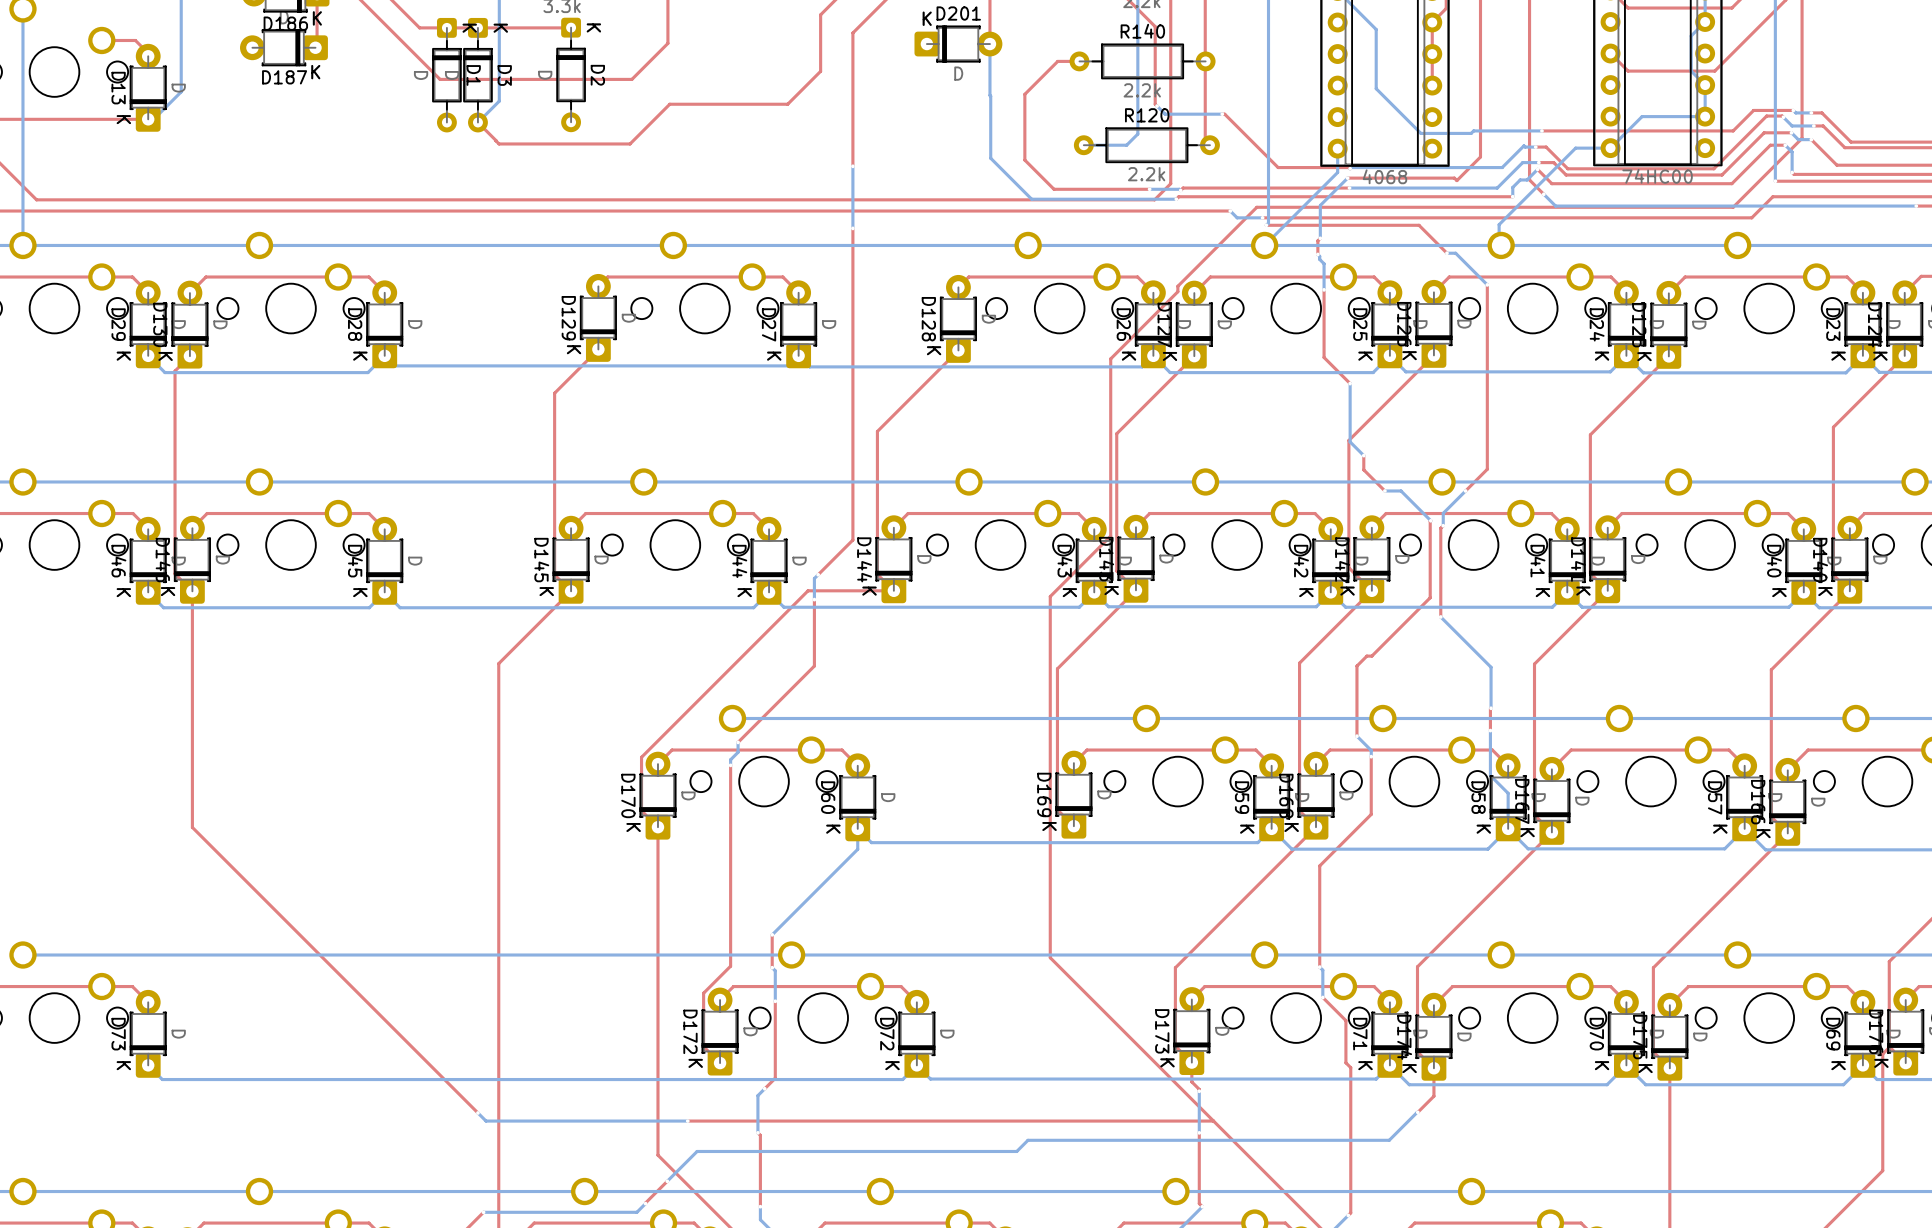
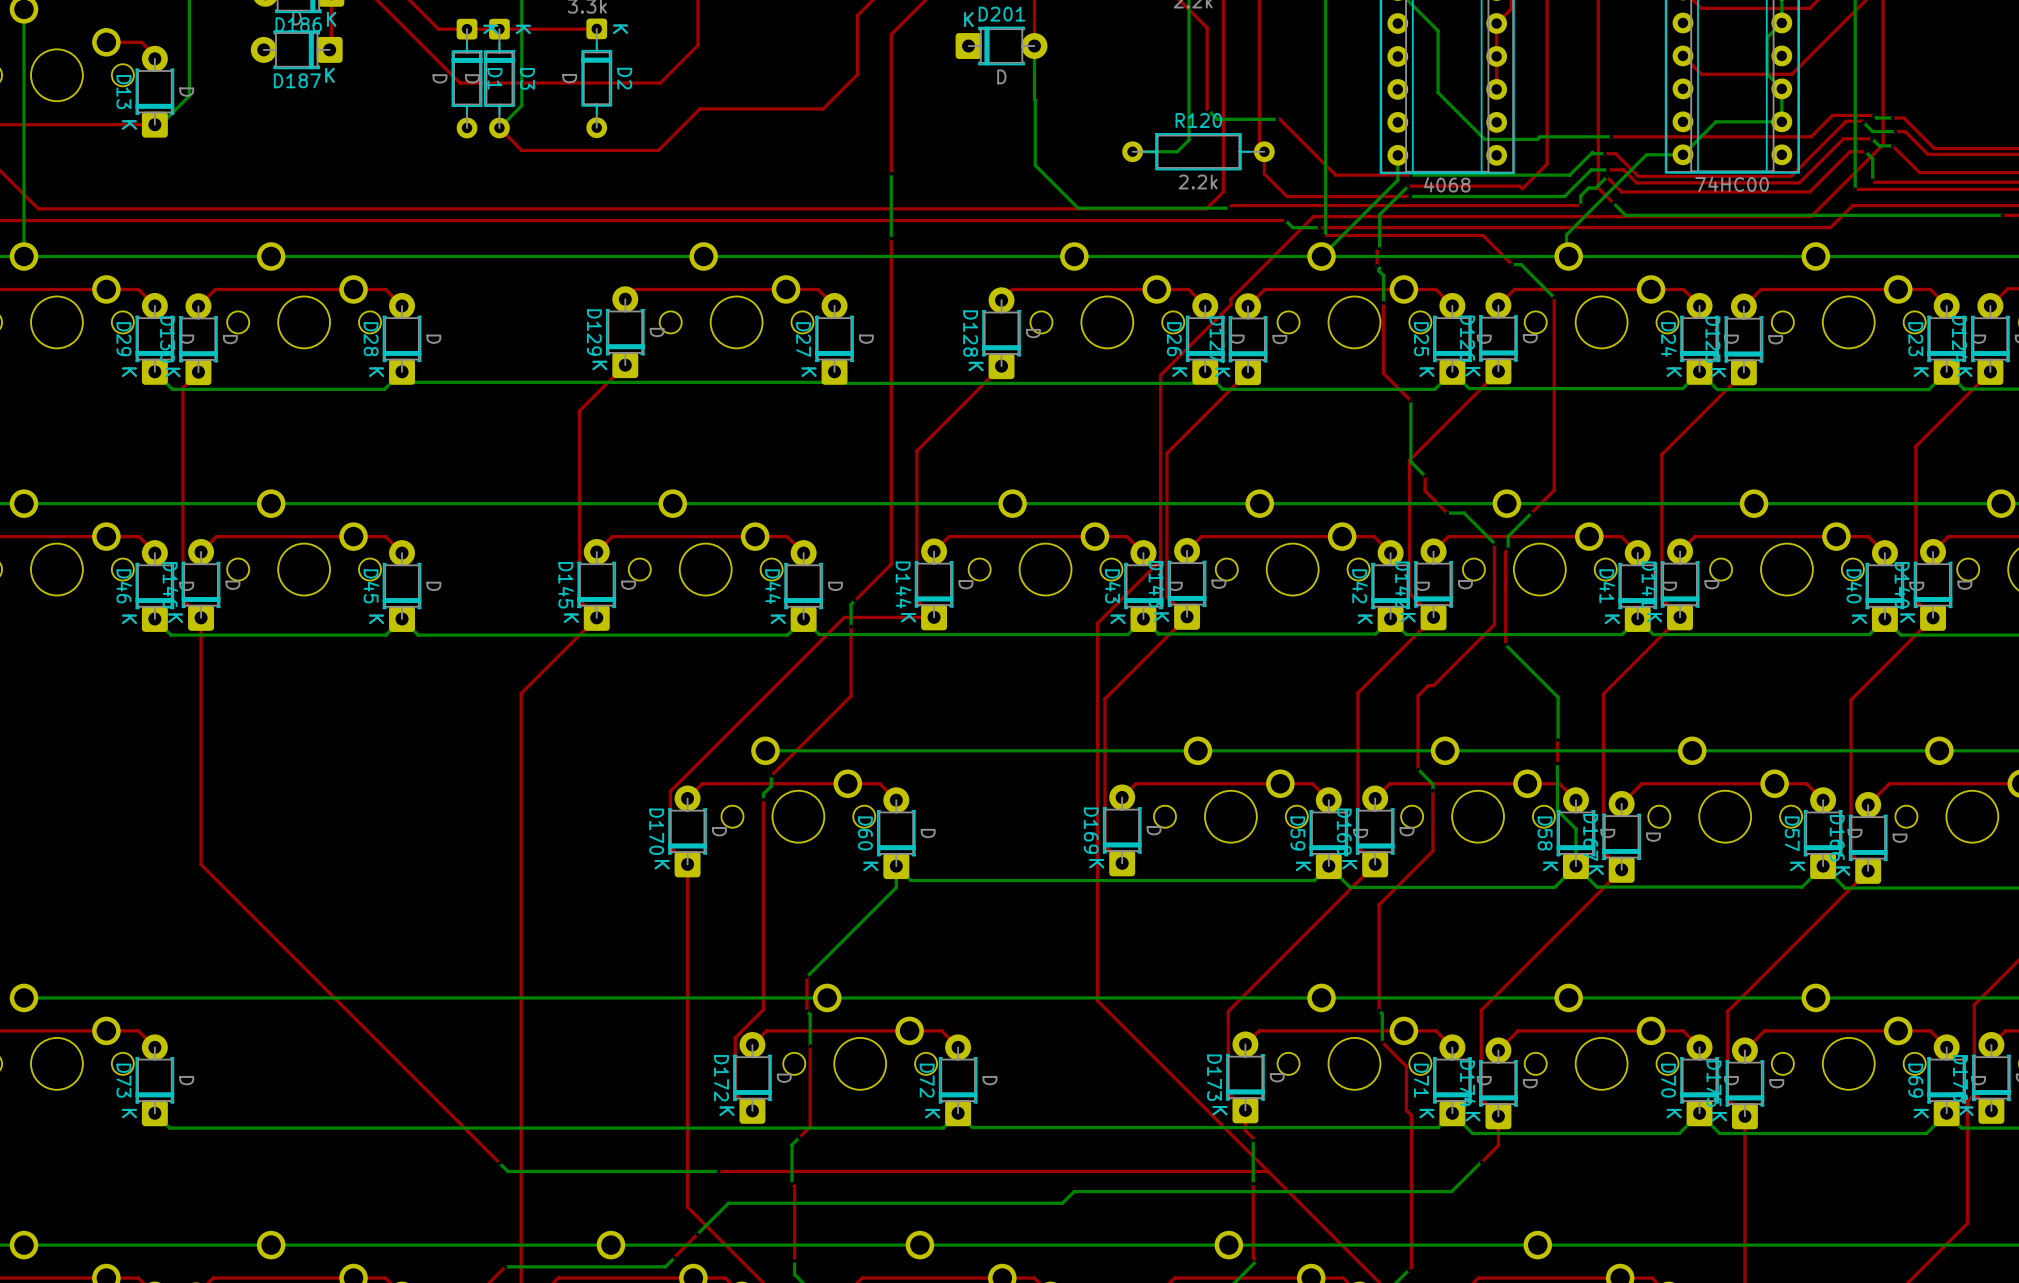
top track: (1079, 61) (1057, 61) (1024, 94) (1024, 160) (1054, 189) (1149, 189) -> none
R140: 2.2k (1142, 61) -> none
top track: (1231, 188) (1183, 188) (1180, 190) -> (1286, 196) (1264, 173) (1264, 151)
bottom track: (1149, 189) (1180, 190) -> none
via: (1149, 189) -> none
via: (1180, 190) -> none

